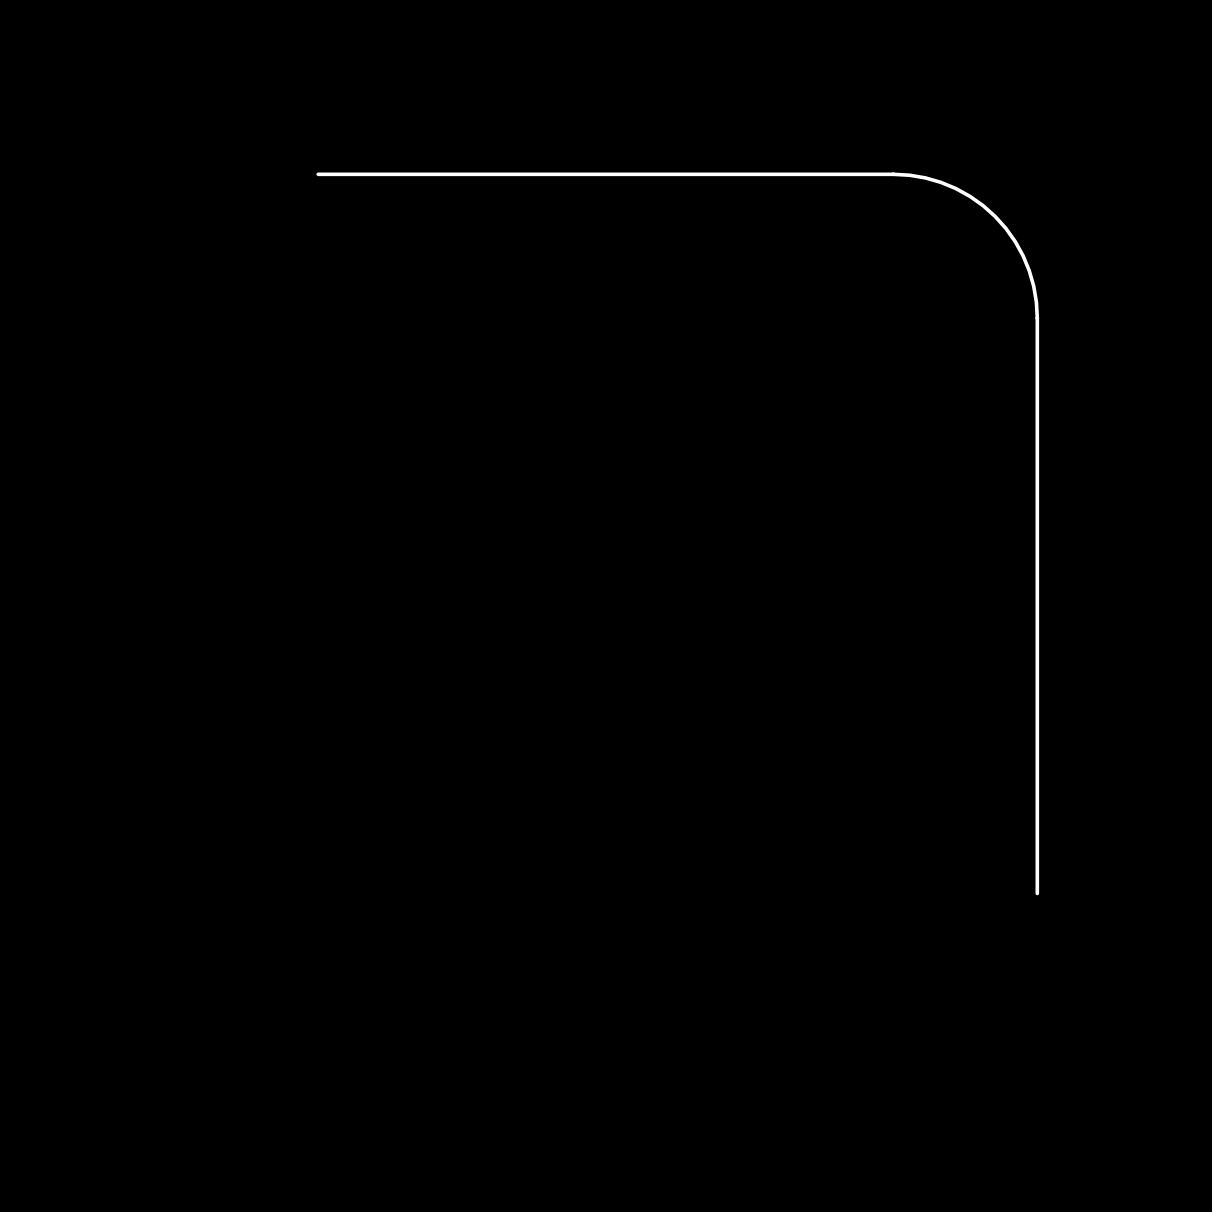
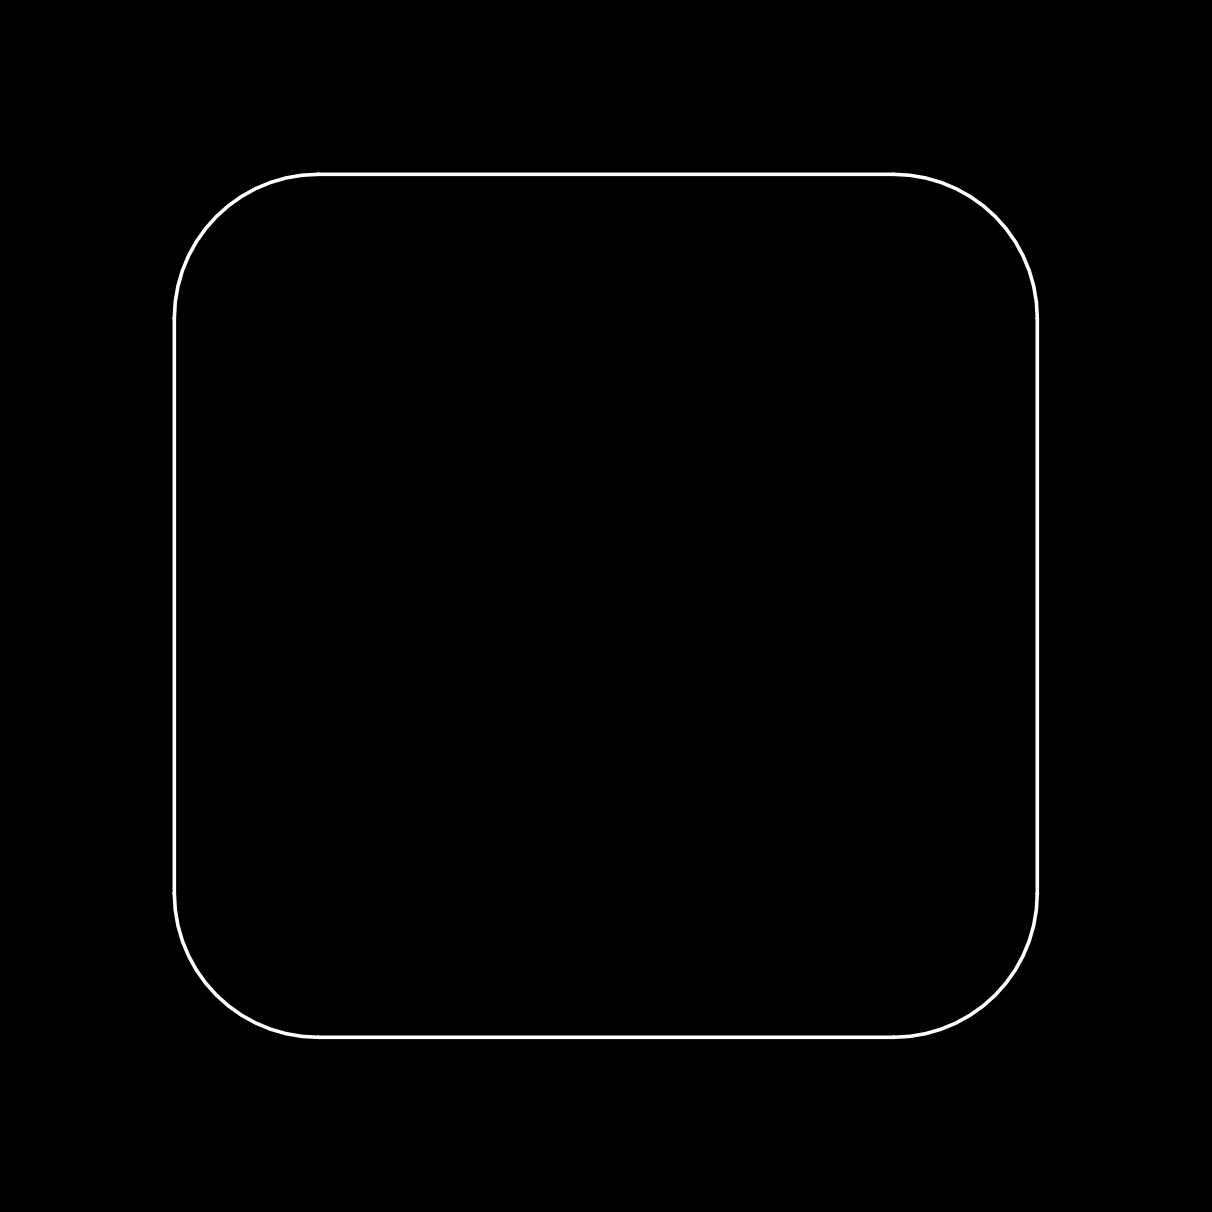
board edge: none -> (318, 174) (286, 177) (270, 182) (255, 188) (228, 205) (205, 228) (188, 255) (182, 270) (175, 302) (175, 909) (177, 925) (188, 955) (196, 969) (216, 995) (241, 1015) (255, 1023) (270, 1029) (302, 1036) (909, 1036) (940, 1029) (955, 1023) (983, 1005) (995, 995) (1015, 969) (1023, 955) (1033, 925) (1037, 893)

